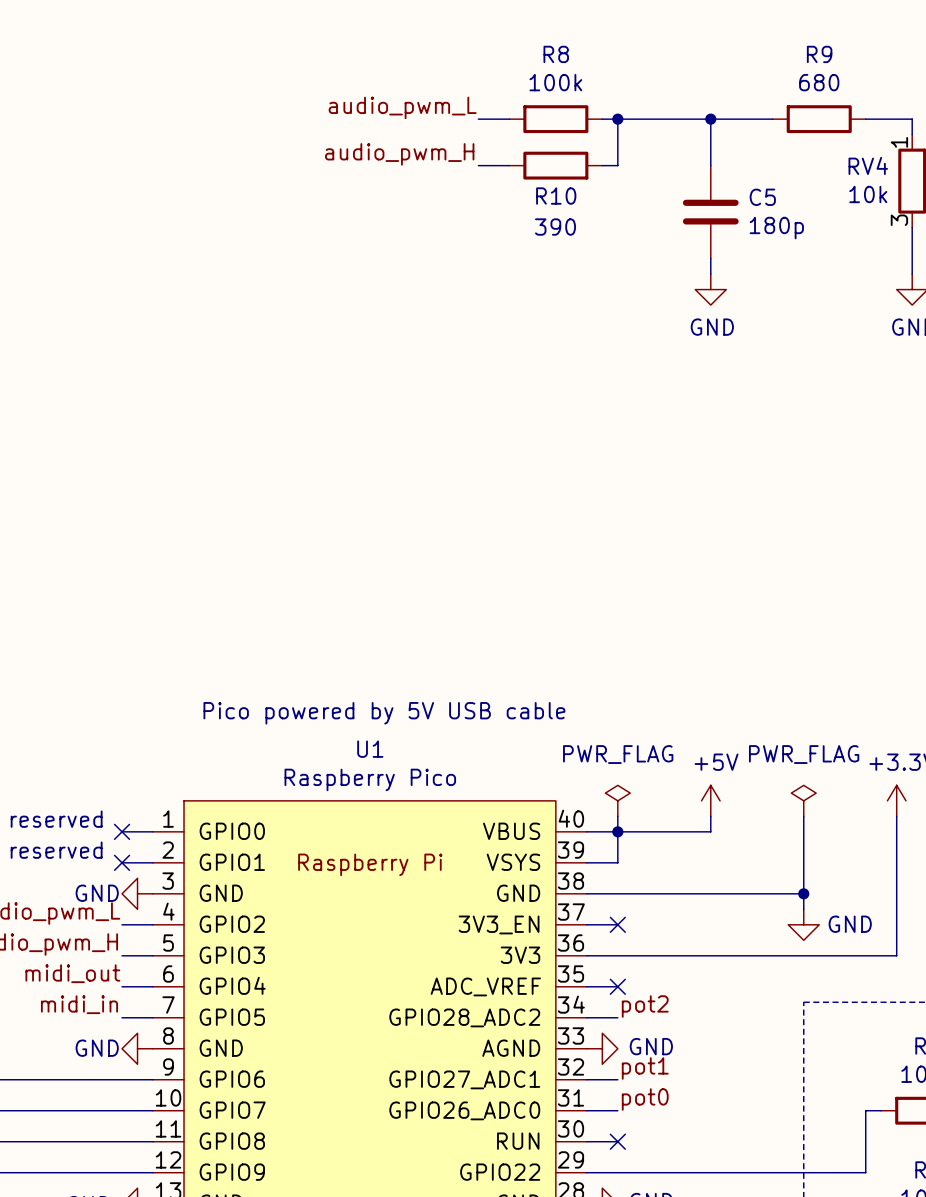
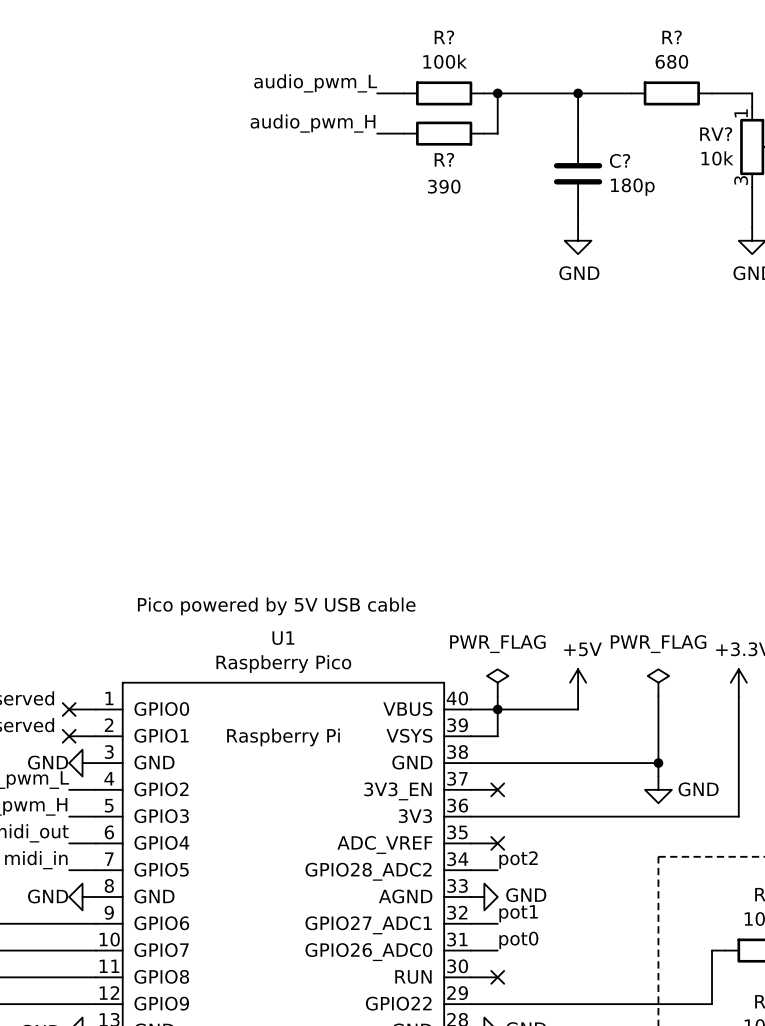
R8 name: R8 (556, 54) -> R? (444, 37)
R9 name: R9 (819, 54) -> R? (672, 37)
RV4 name: RV4 (868, 165) -> RV? (716, 134)
R10 name: R10 (556, 196) -> R? (444, 159)
C5 name: C5 (762, 197) -> C? (620, 160)

